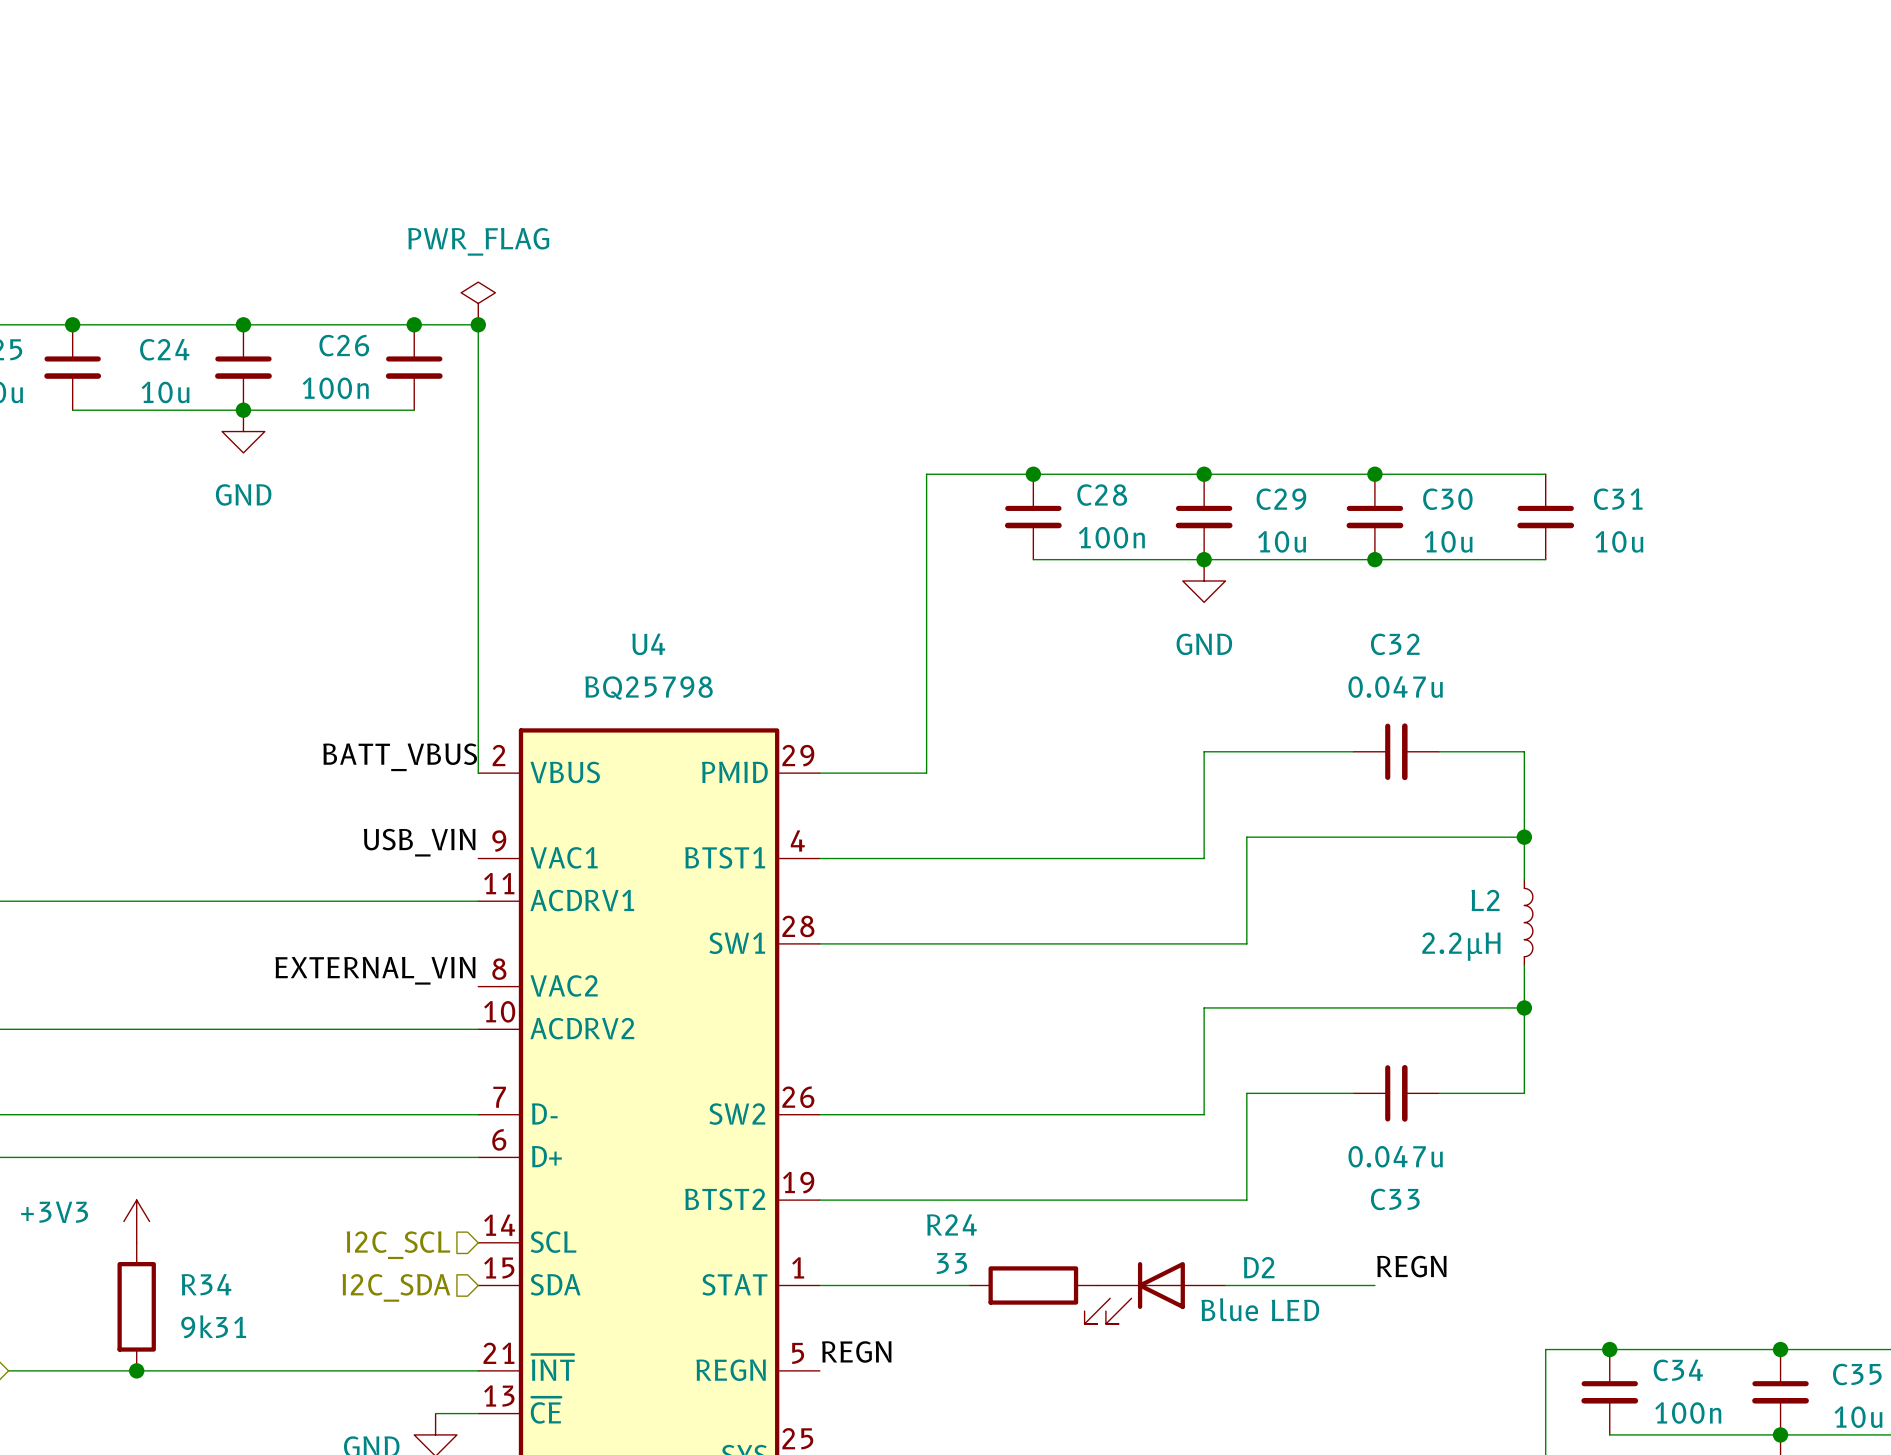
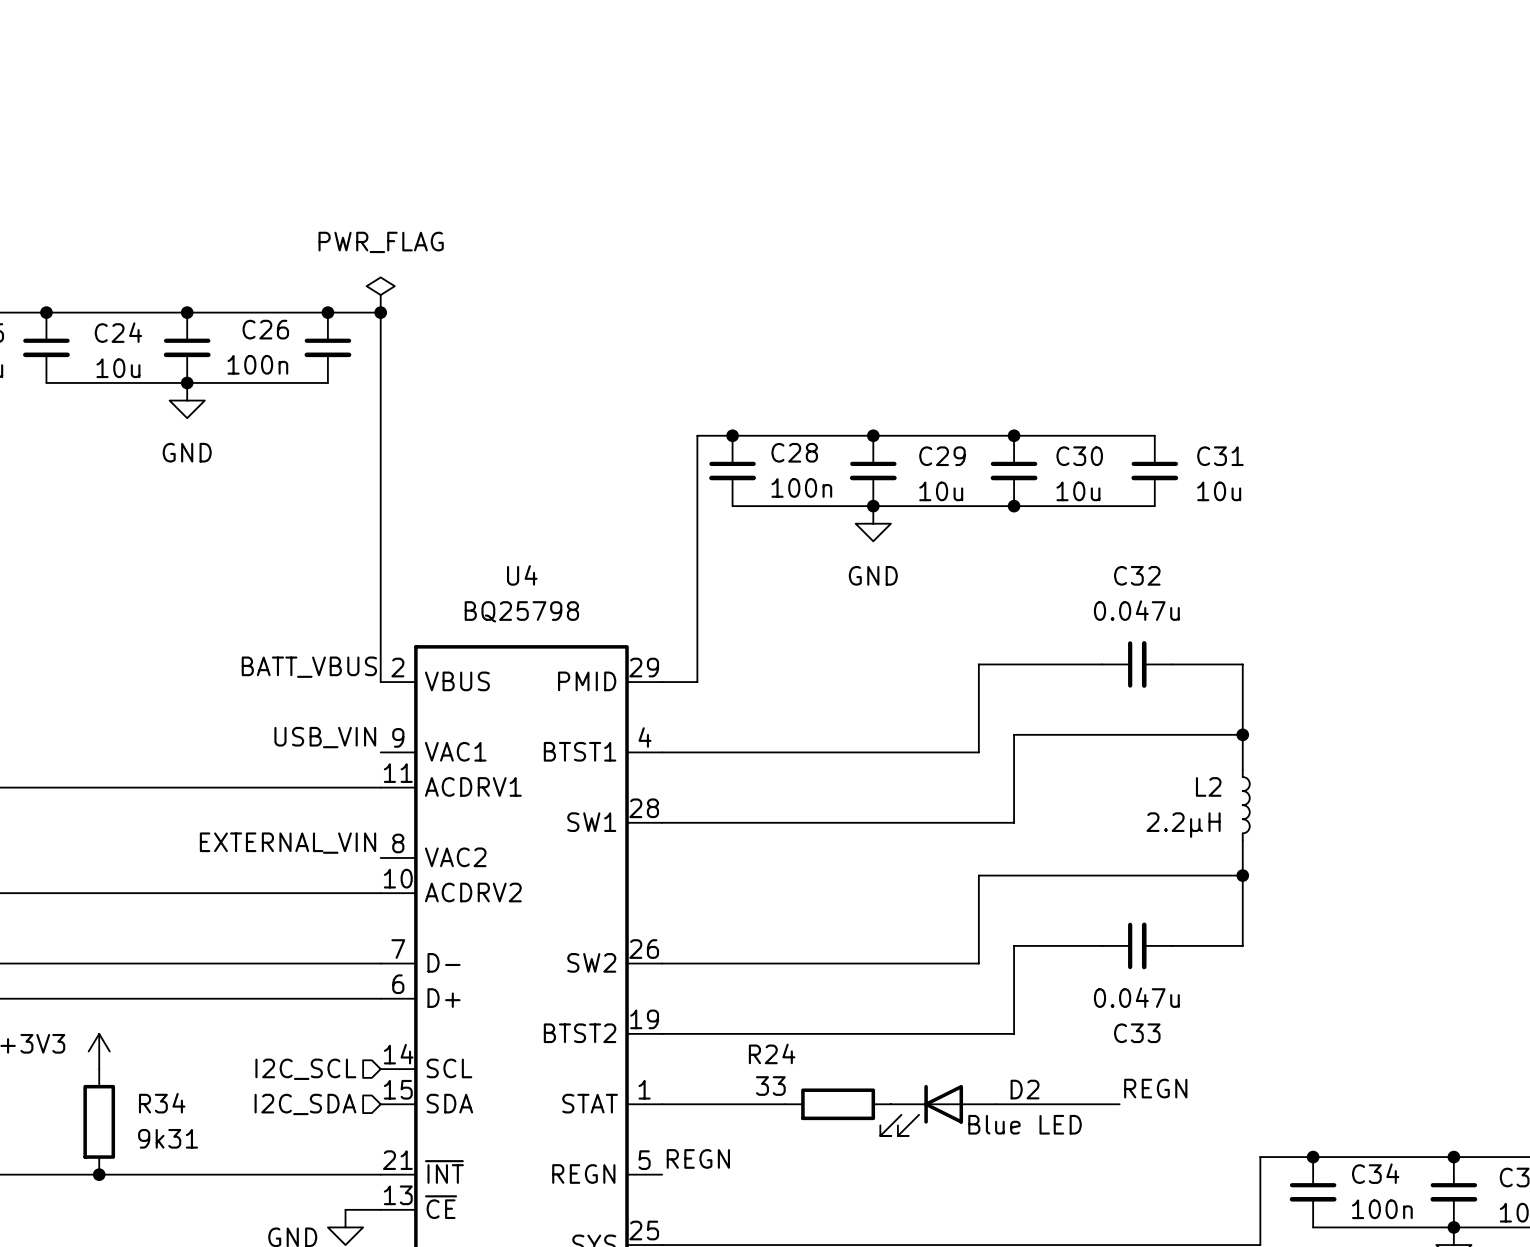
junction: none -> (732, 435)
wire: (926, 474) (926, 773) (862, 773) -> (750, 435) (697, 435) (697, 682)
junction position: (1033, 474) -> (873, 435)
junction position: (1204, 474) -> (1014, 435)
junction: (1374, 474) -> none
wire: (1417, 474) (1545, 474) -> none
C28 position: (1033, 516) -> (732, 470)
C29 position: (1204, 516) -> (873, 470)
C30 position: (1374, 516) -> (1014, 470)
C31 position: (1545, 516) -> (1154, 470)
wire: none -> (732, 506) (838, 506)
junction: none -> (873, 506)
junction position: (1204, 559) -> (1014, 506)
junction: (1374, 559) -> none
wire: (1417, 559) (1545, 559) -> none
power symbol position: GND (1204, 580) -> GND (873, 523)

